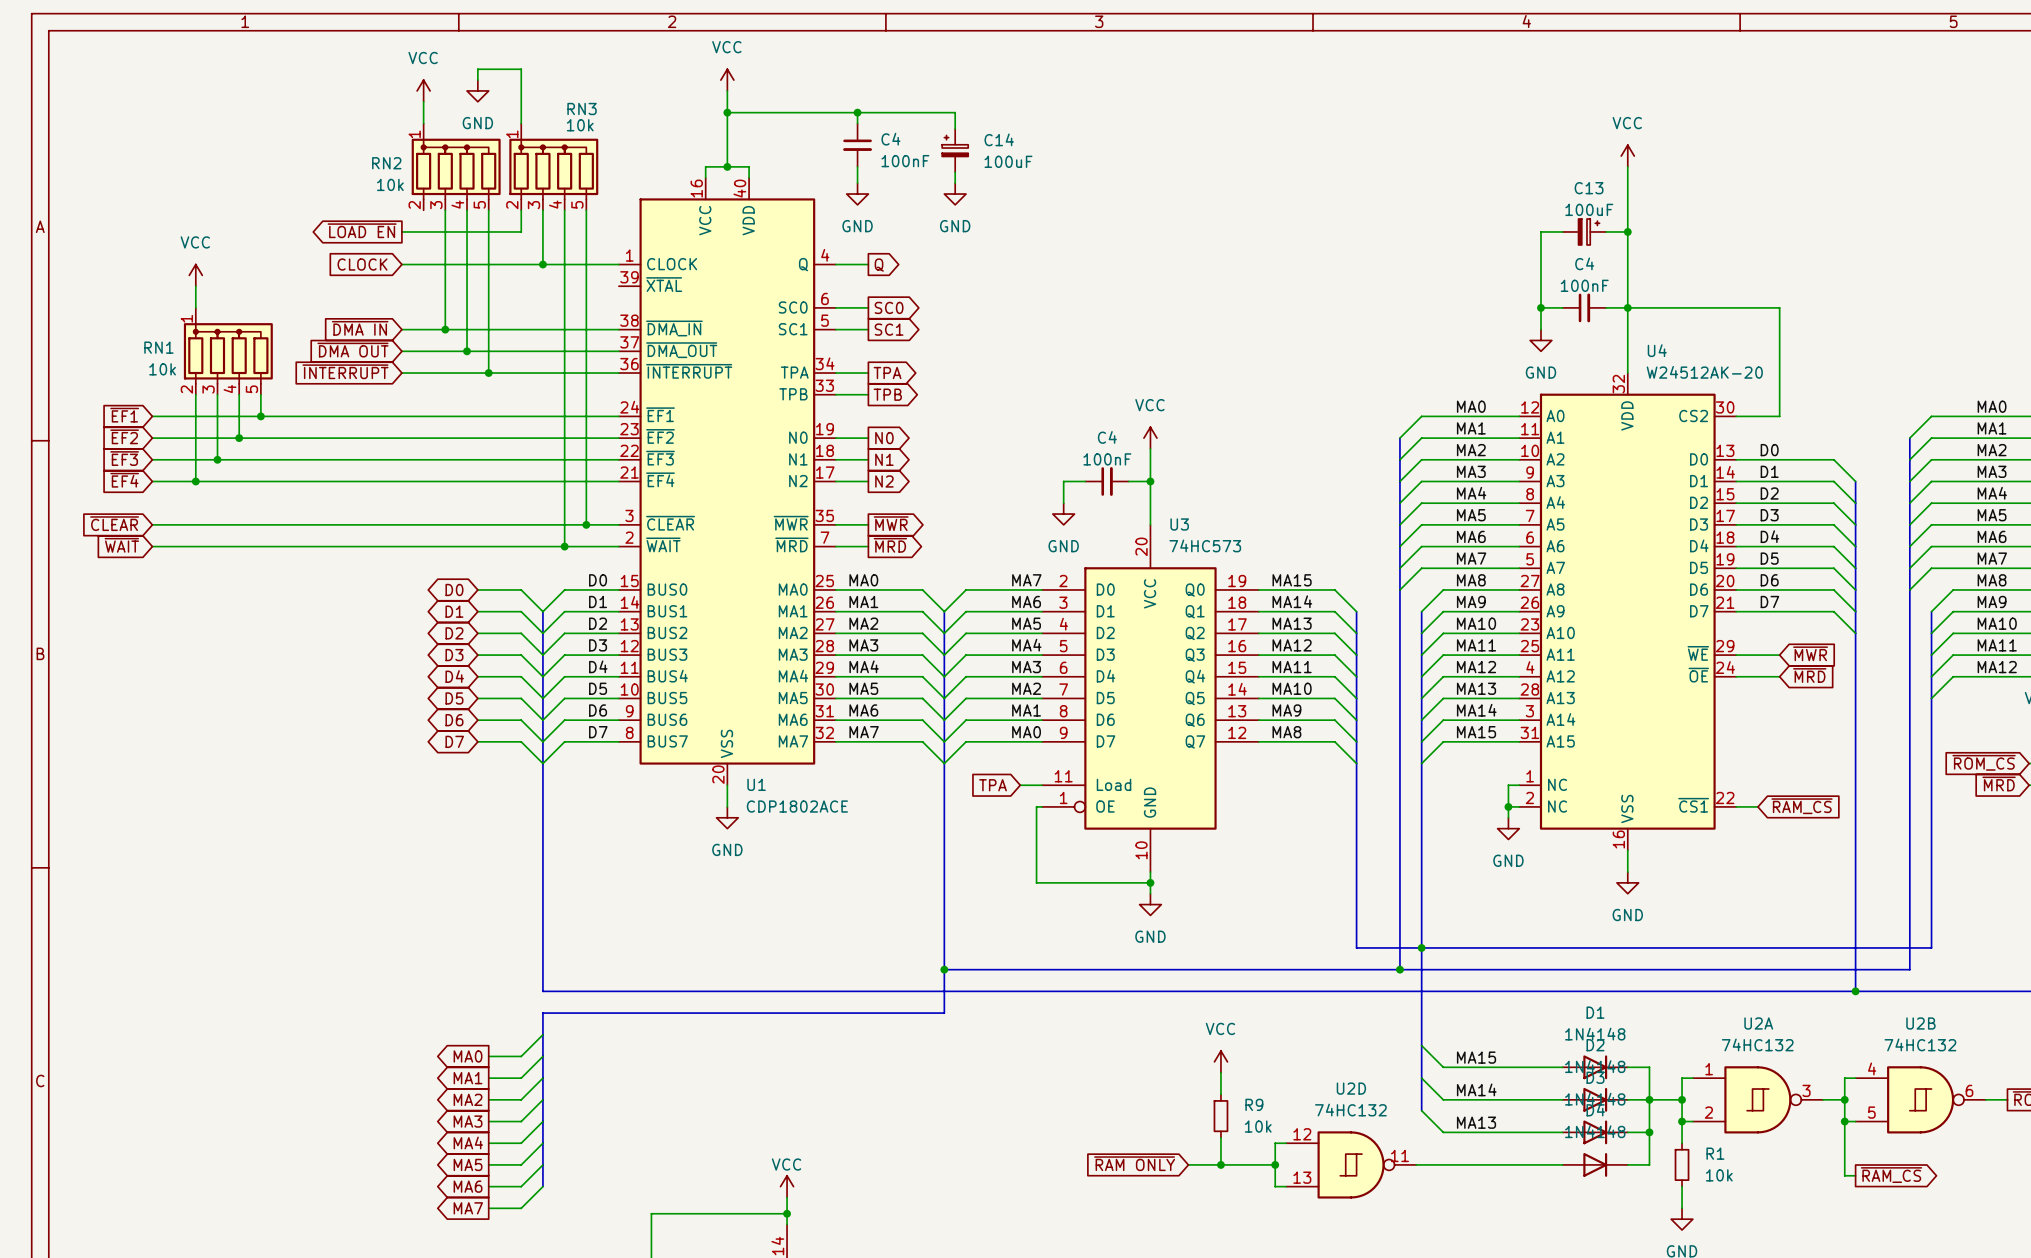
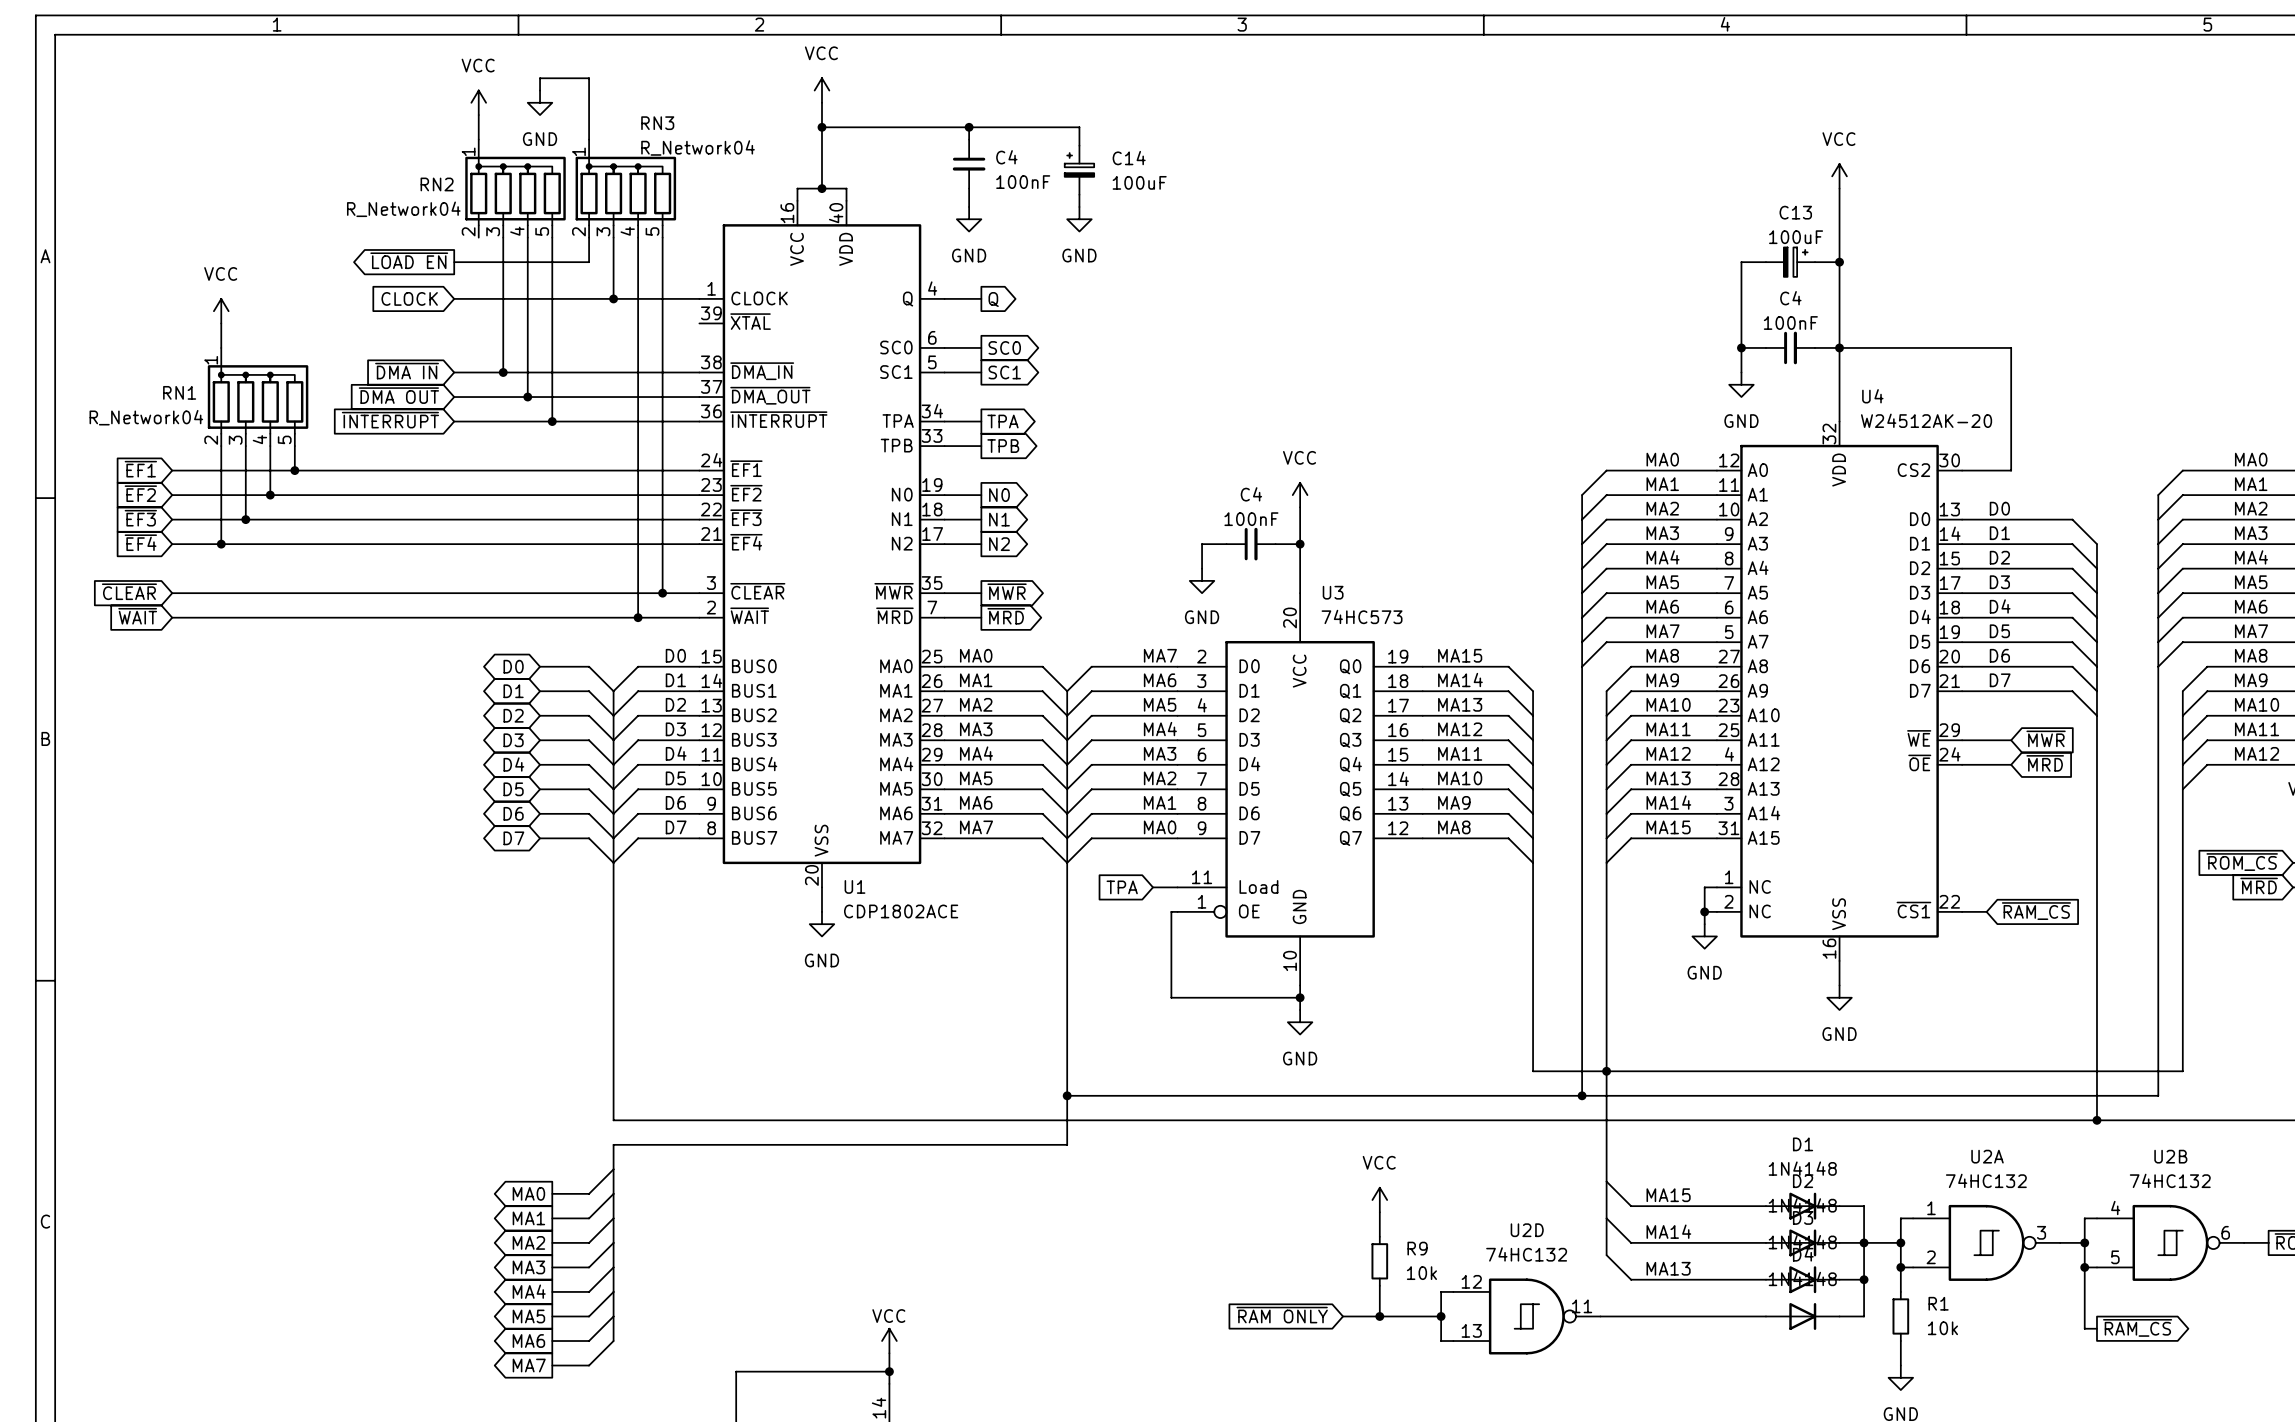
RN3 value: 10k (580, 125) -> R_Network04 (698, 147)
RN2 value: 10k (390, 184) -> R_Network04 (403, 209)
RN1 value: 10k (162, 369) -> R_Network04 (146, 417)

